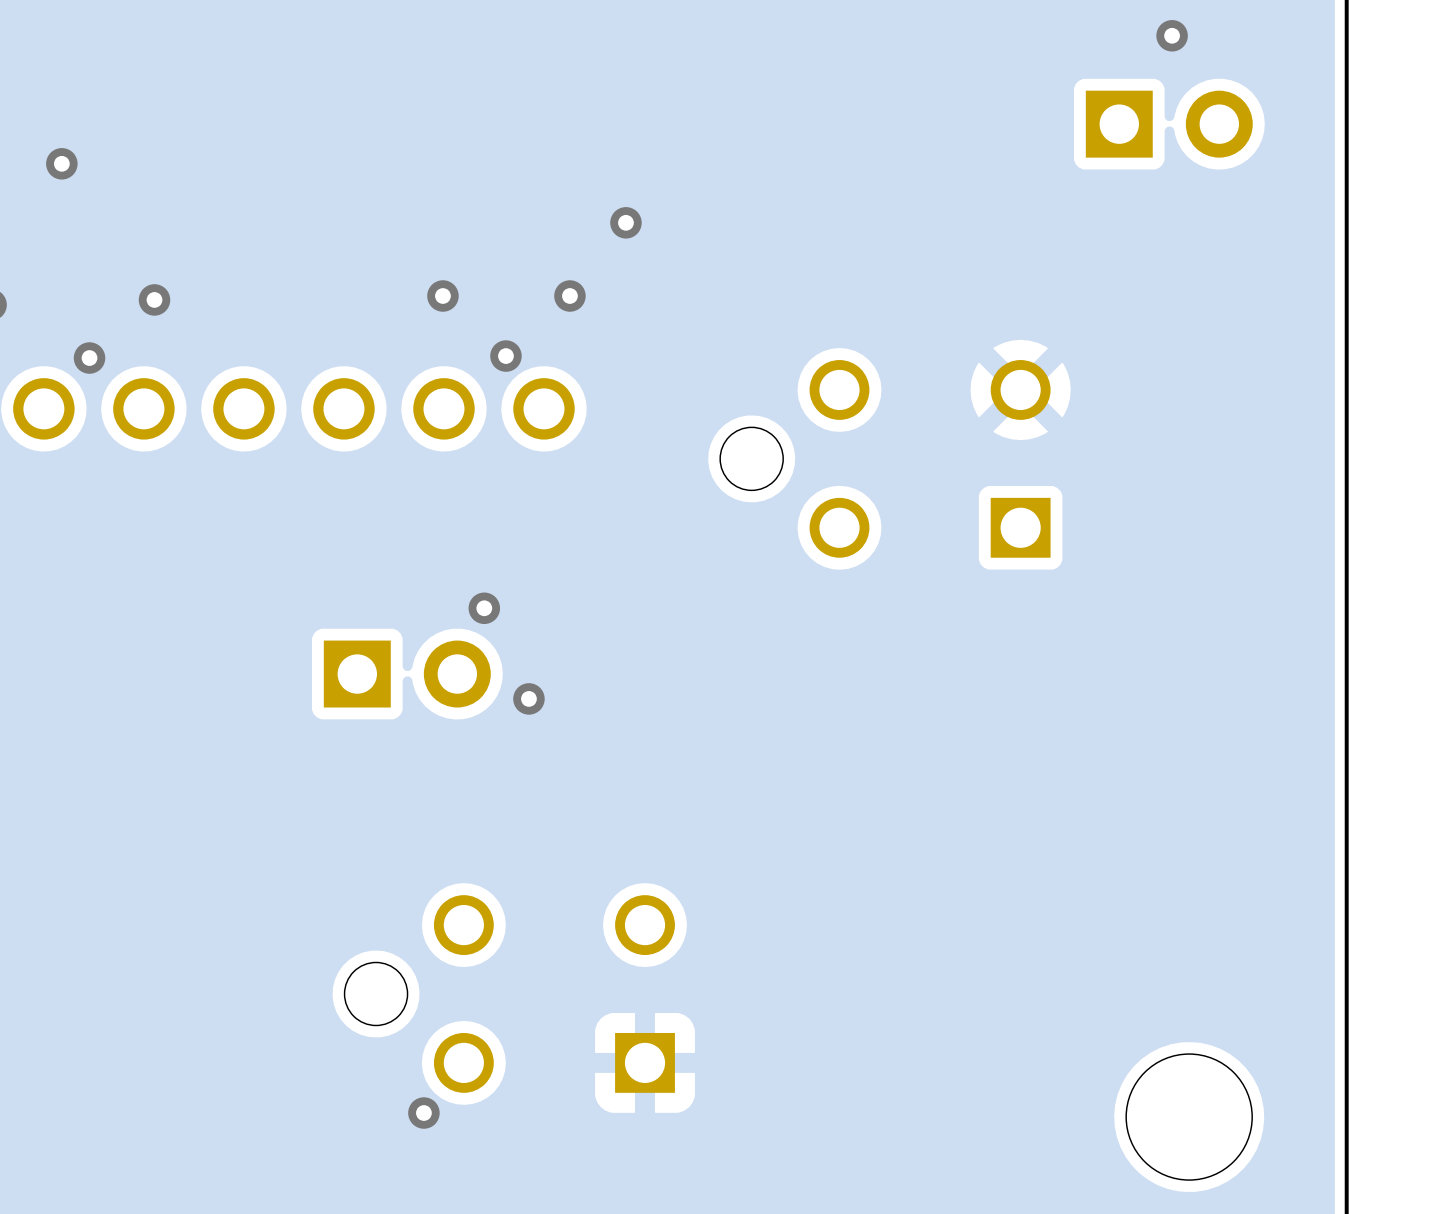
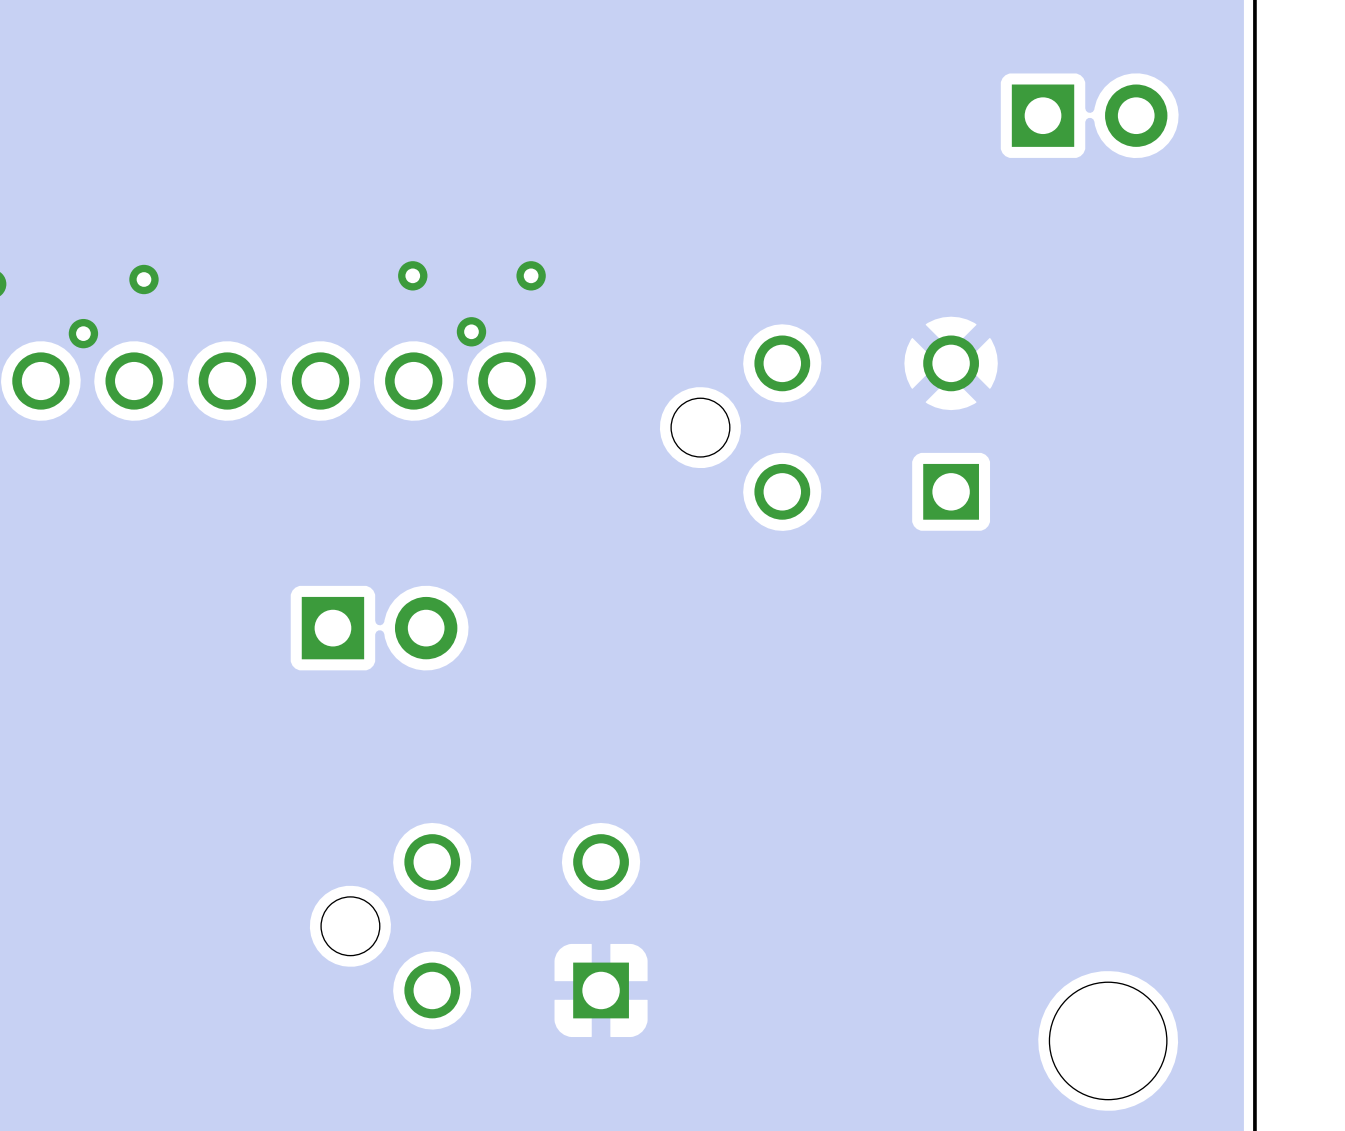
via: (1172, 35) -> none
via: (61, 163) -> none
via: (625, 222) -> none
via: (484, 608) -> none
via: (528, 698) -> none
via: (423, 1113) -> none

